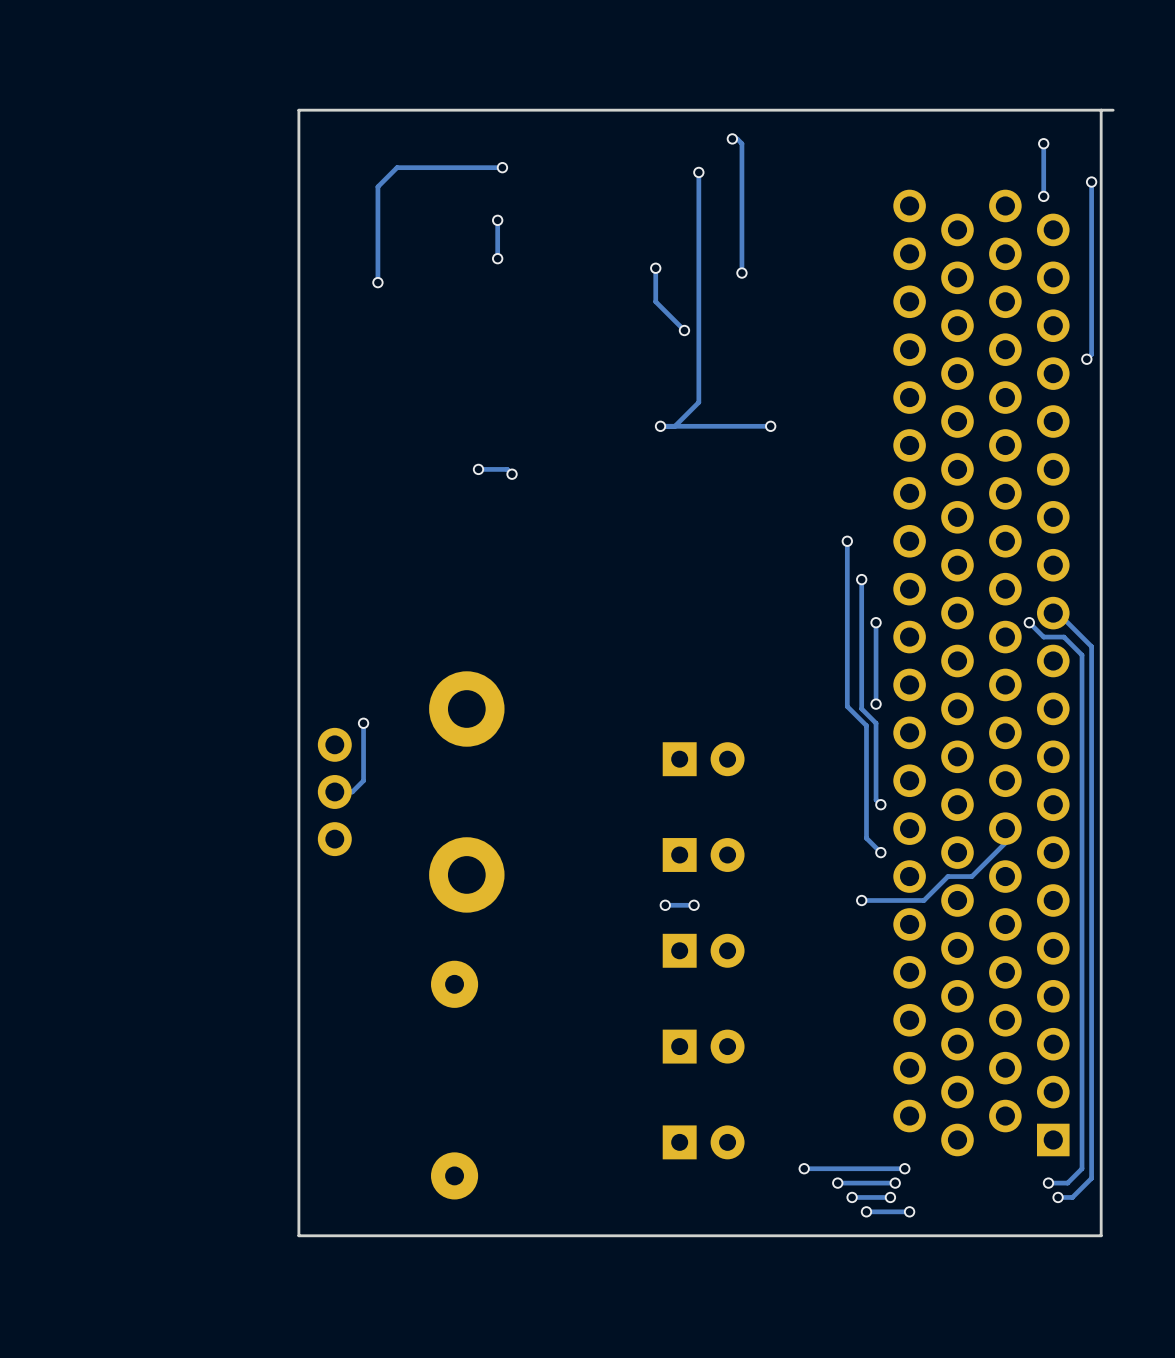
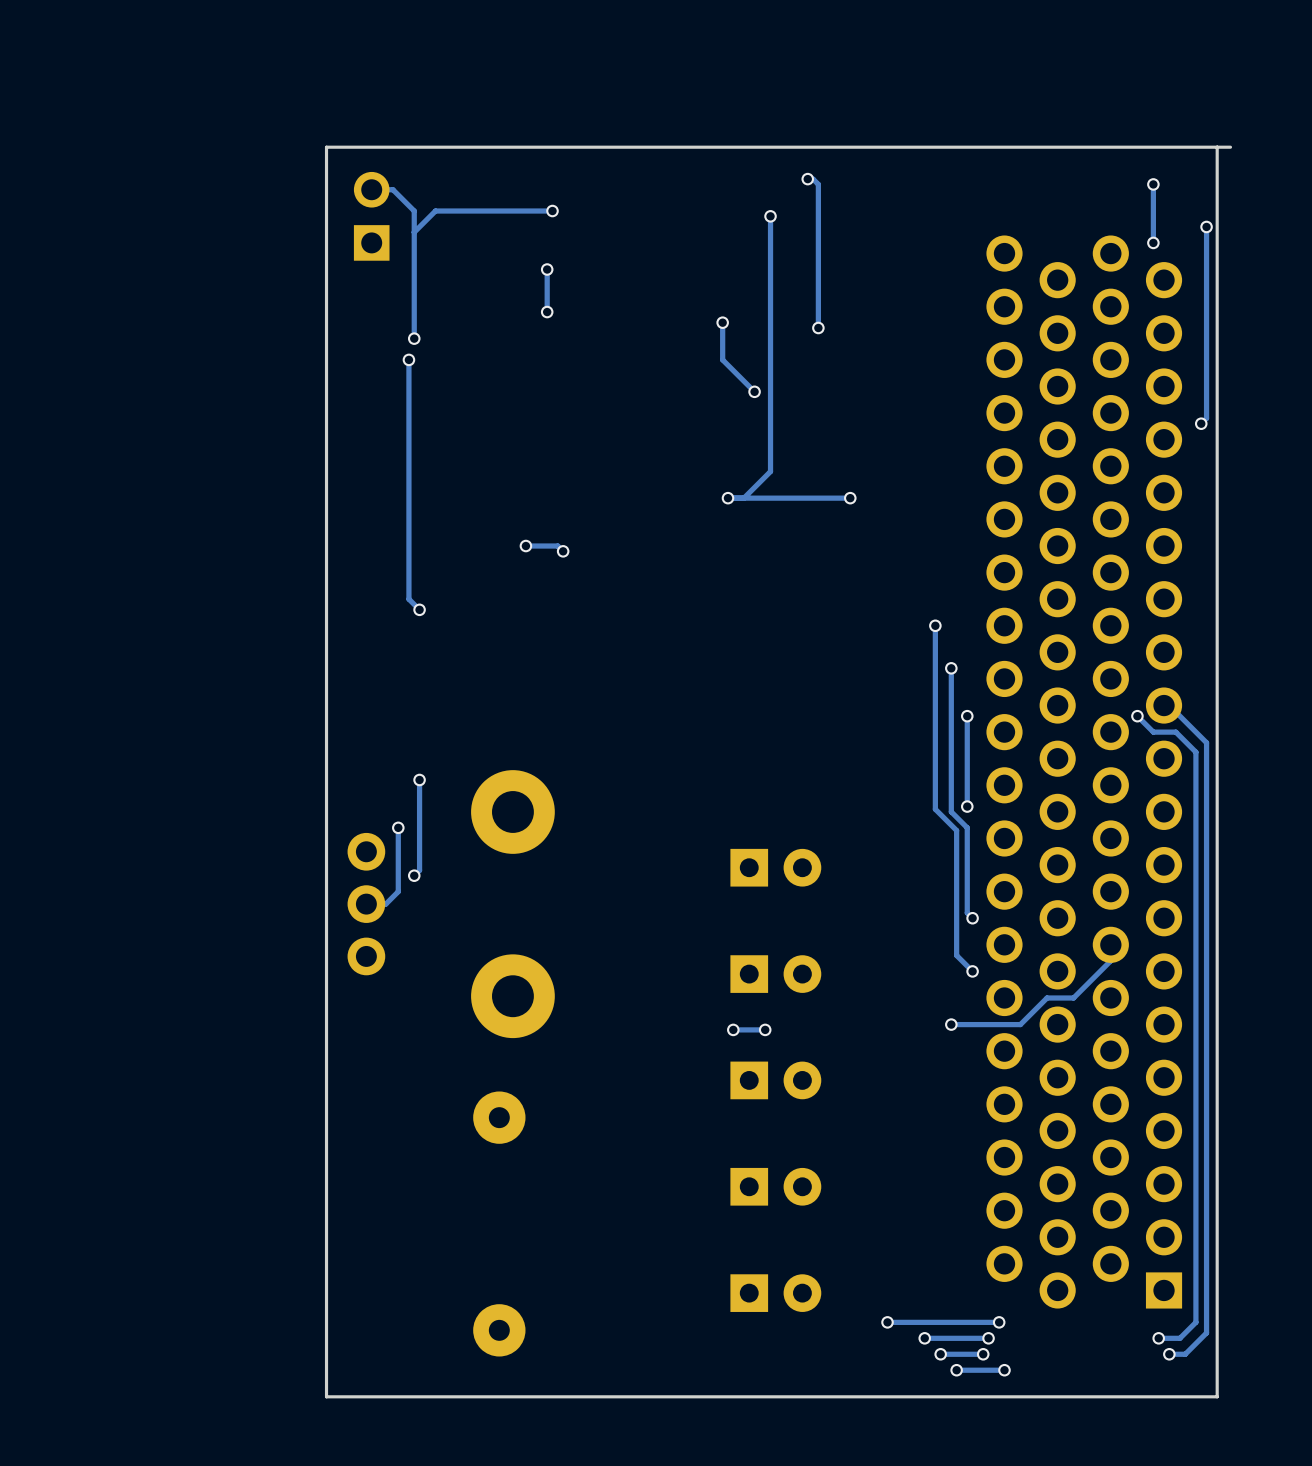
track: none -> (371, 189) (392, 189) (414, 211) (414, 232)
part: none -> (371, 216)
track: none -> (408, 359) (408, 599) (419, 609)
via: none -> (408, 359)
via: none -> (419, 609)
track: none -> (419, 779) (419, 870) (414, 875)
via: none -> (419, 779)
via: none -> (414, 875)

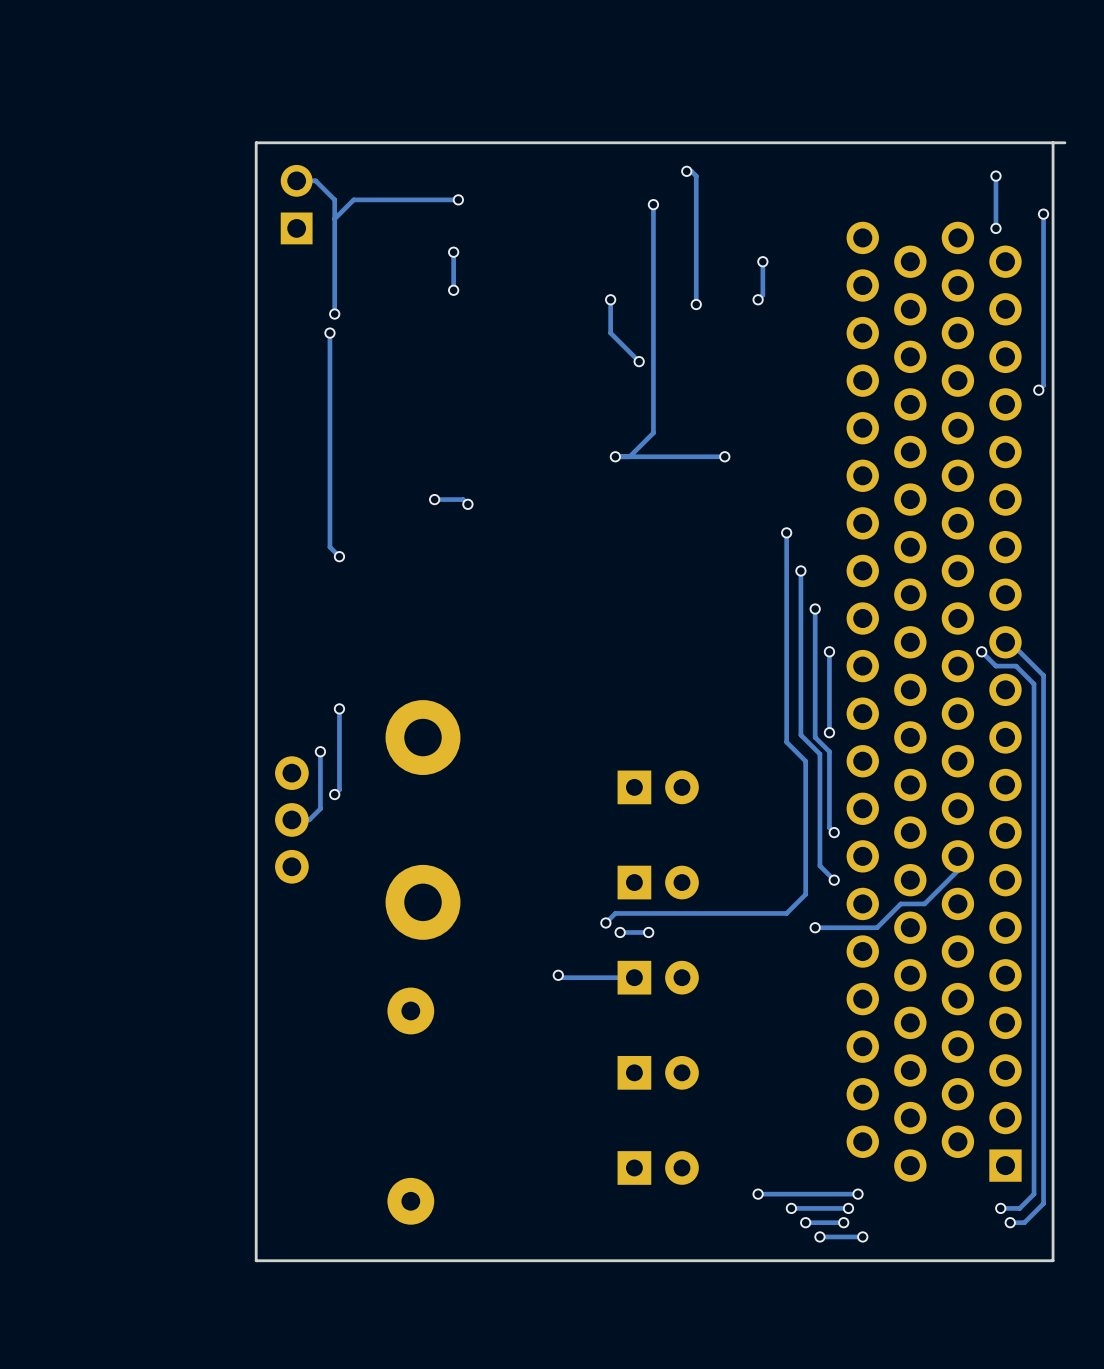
track: none -> (762, 261) (762, 295) (758, 299)
via: none -> (762, 261)
via: none -> (758, 299)
track: none -> (786, 532) (786, 742) (805, 761) (805, 894) (786, 913) (615, 913) (605, 922)
via: none -> (786, 532)
via: none -> (605, 922)
track: none -> (558, 975) (560, 977) (634, 977)
via: none -> (558, 975)

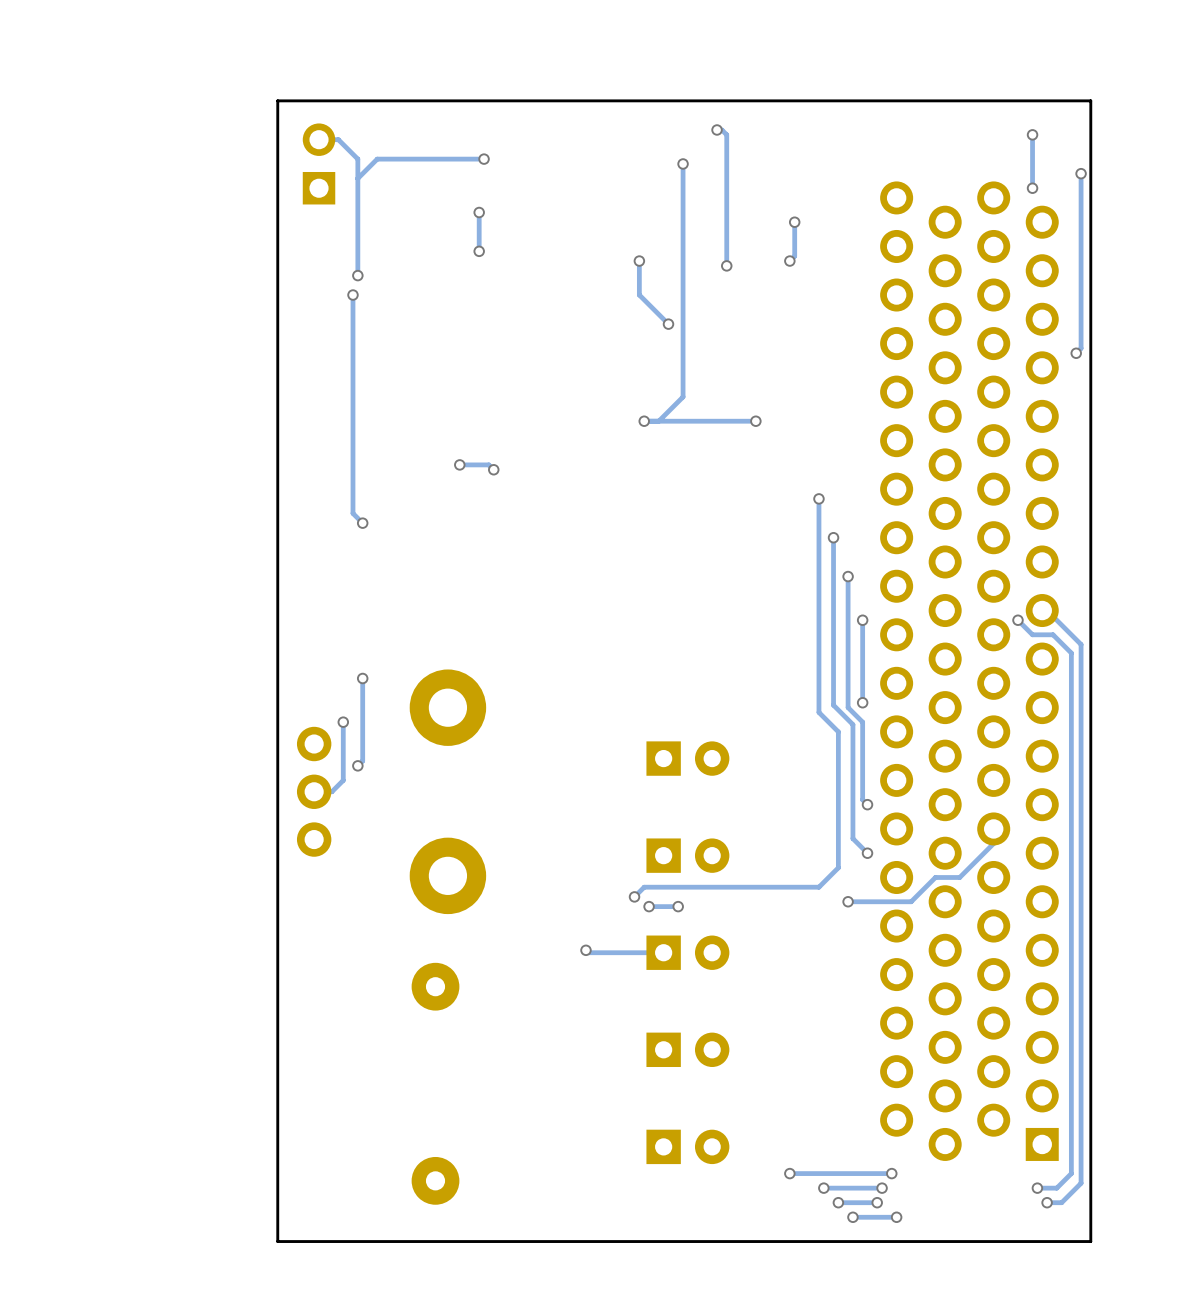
board edge: (1064, 142) (1053, 142) -> none

